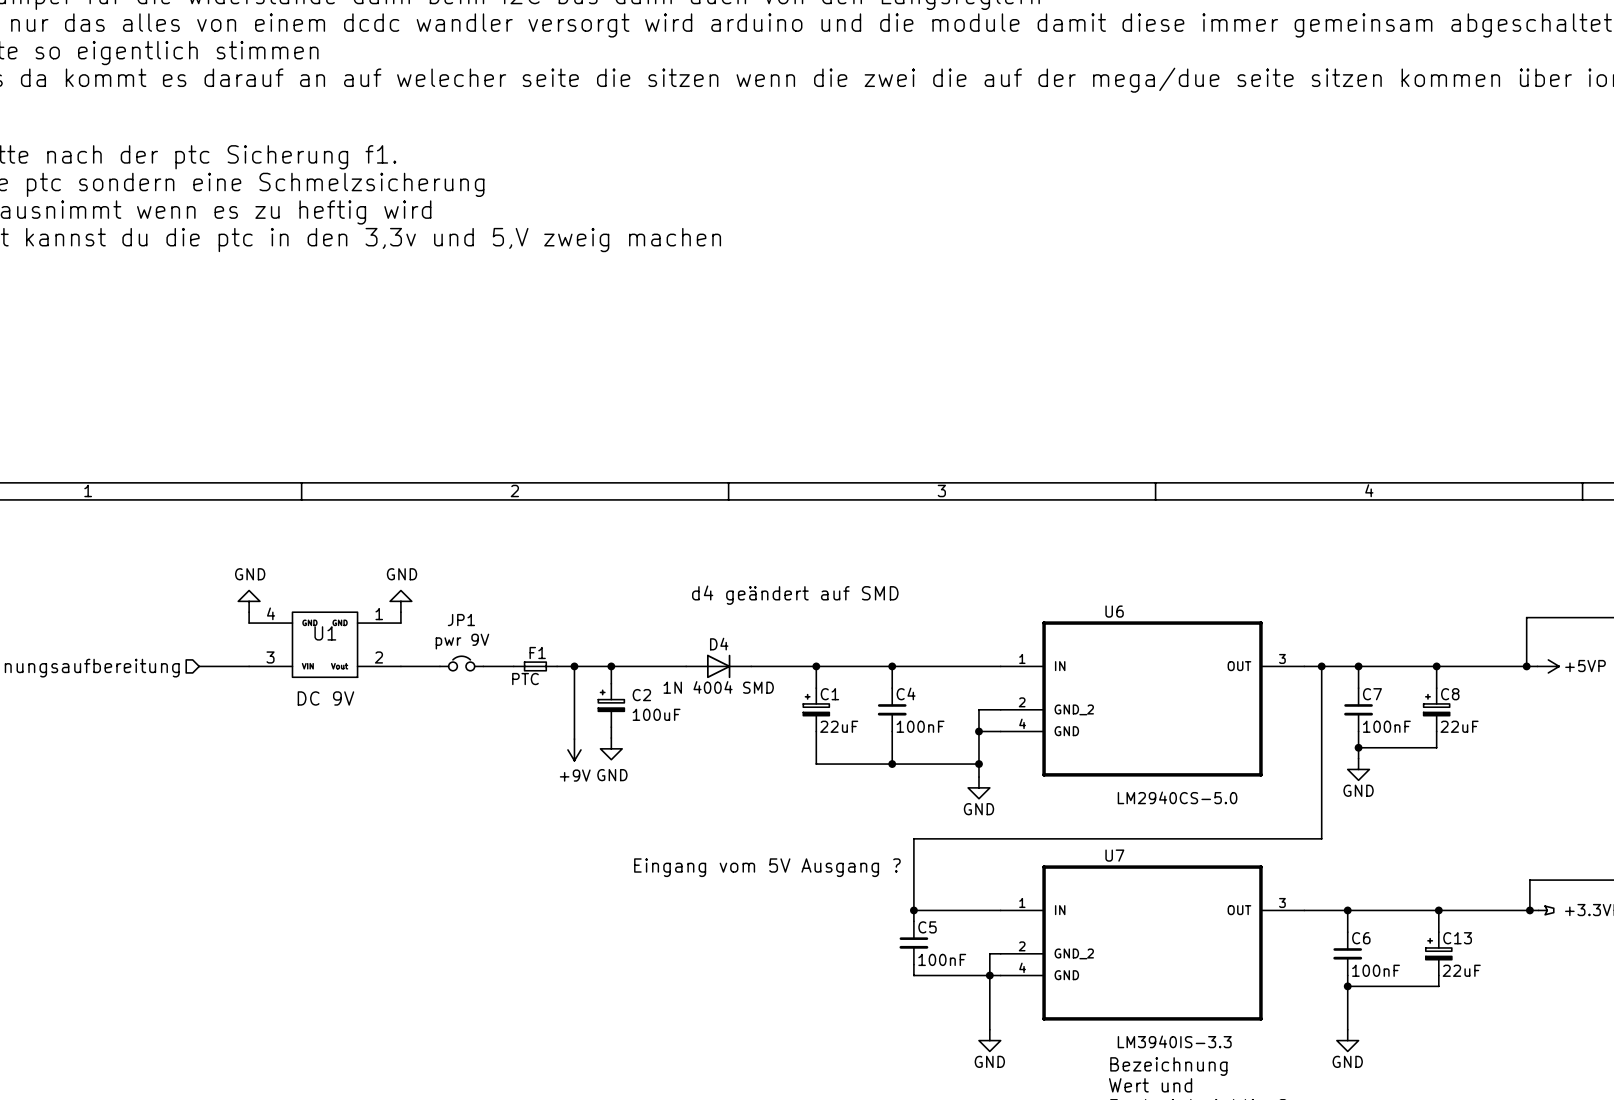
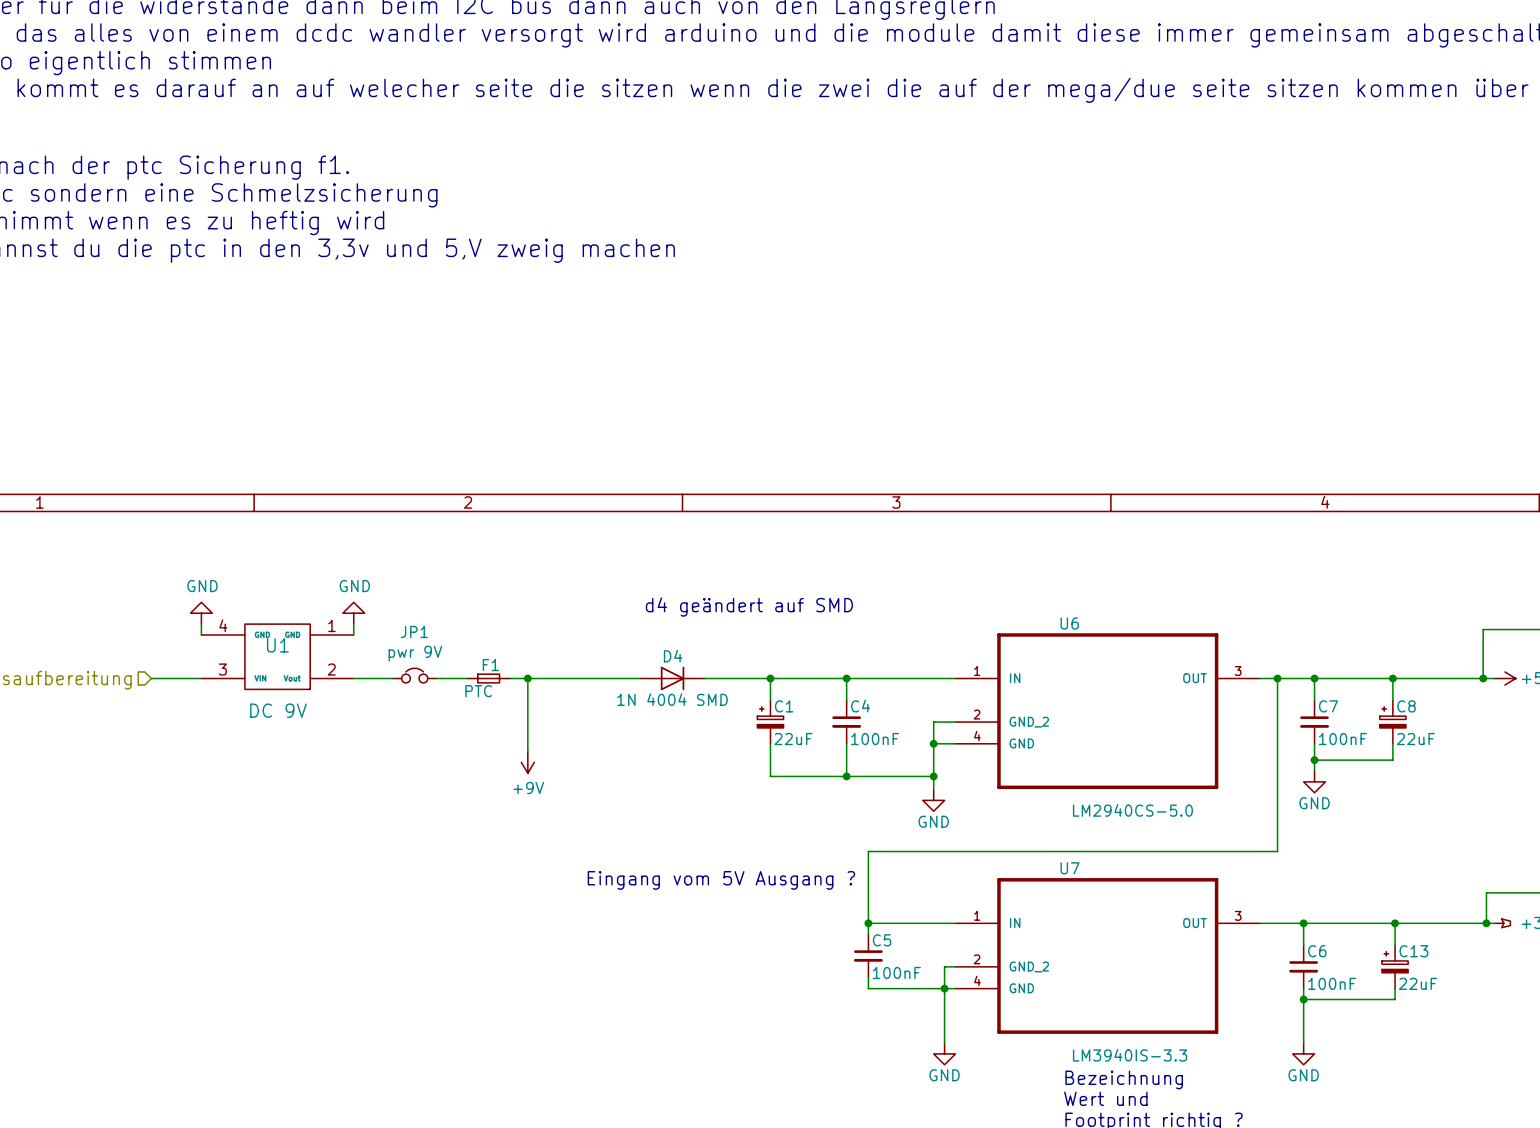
wire: (611, 666) (611, 683) -> none
junction: (611, 666) -> none
C2: 100uF (611, 705) -> none
wire: (611, 727) (611, 738) -> none
power symbol: GND (611, 748) -> none

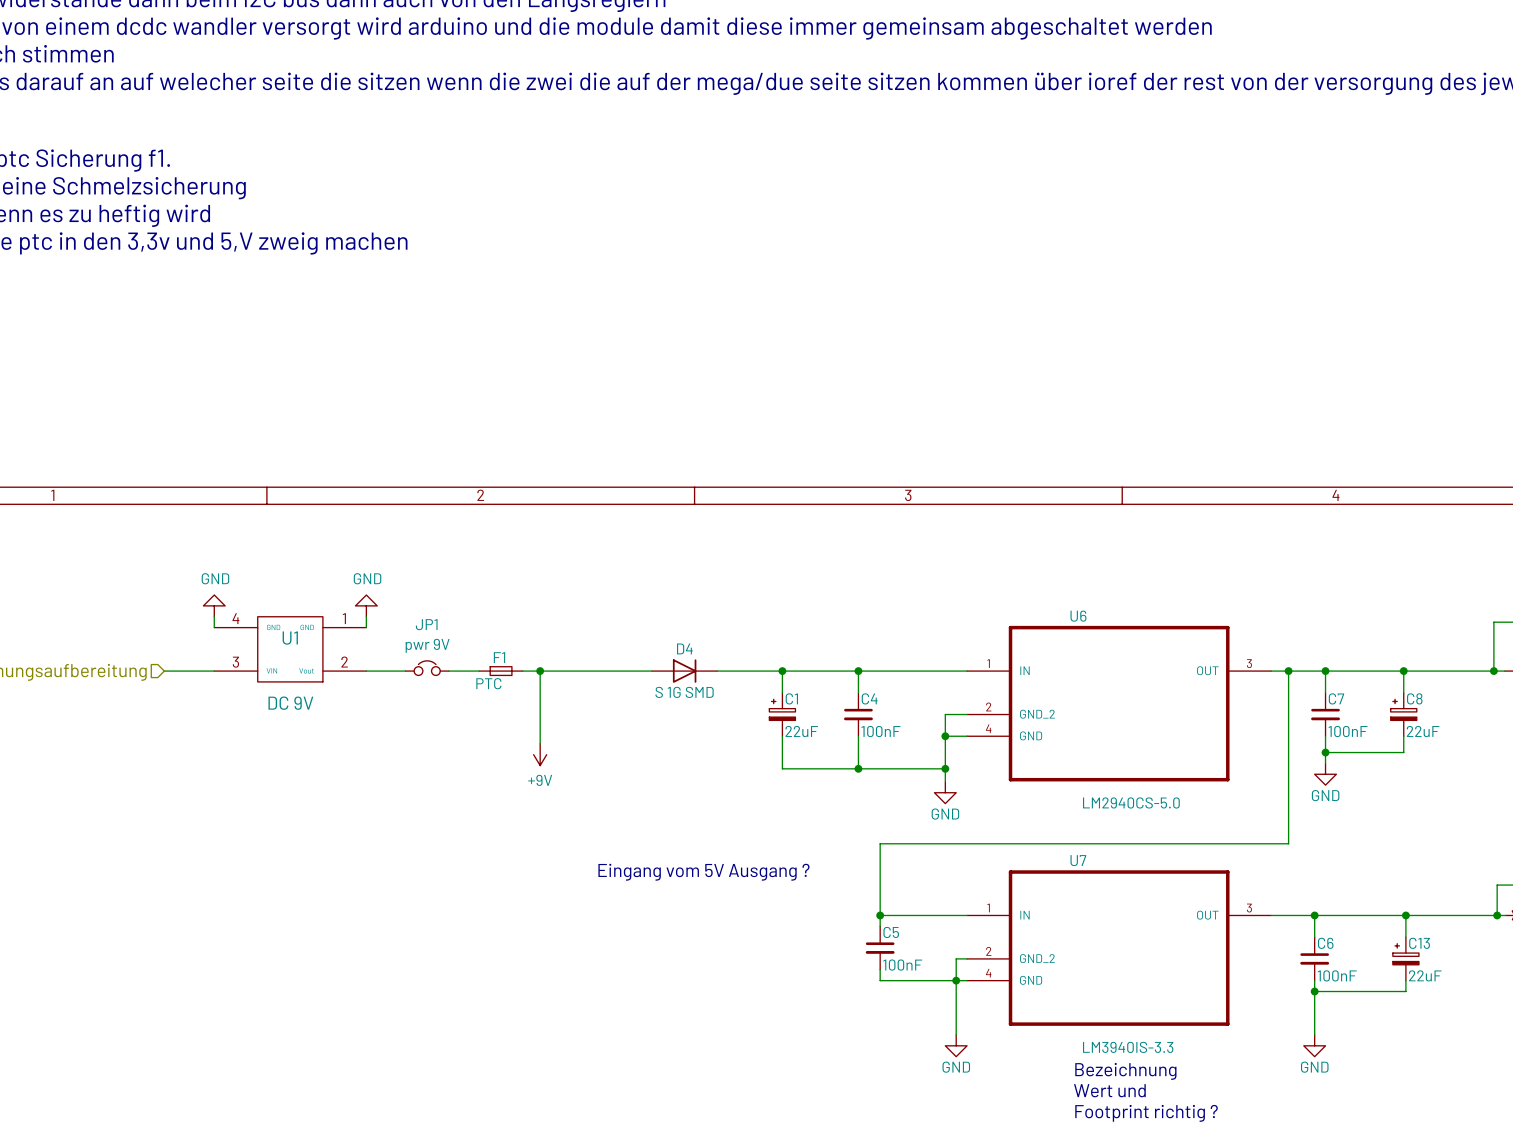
text: d4 geändert auf SMD (749, 607) -> none
D4 value: 1N 4004 SMD (672, 699) -> S 1G SMD (684, 692)

